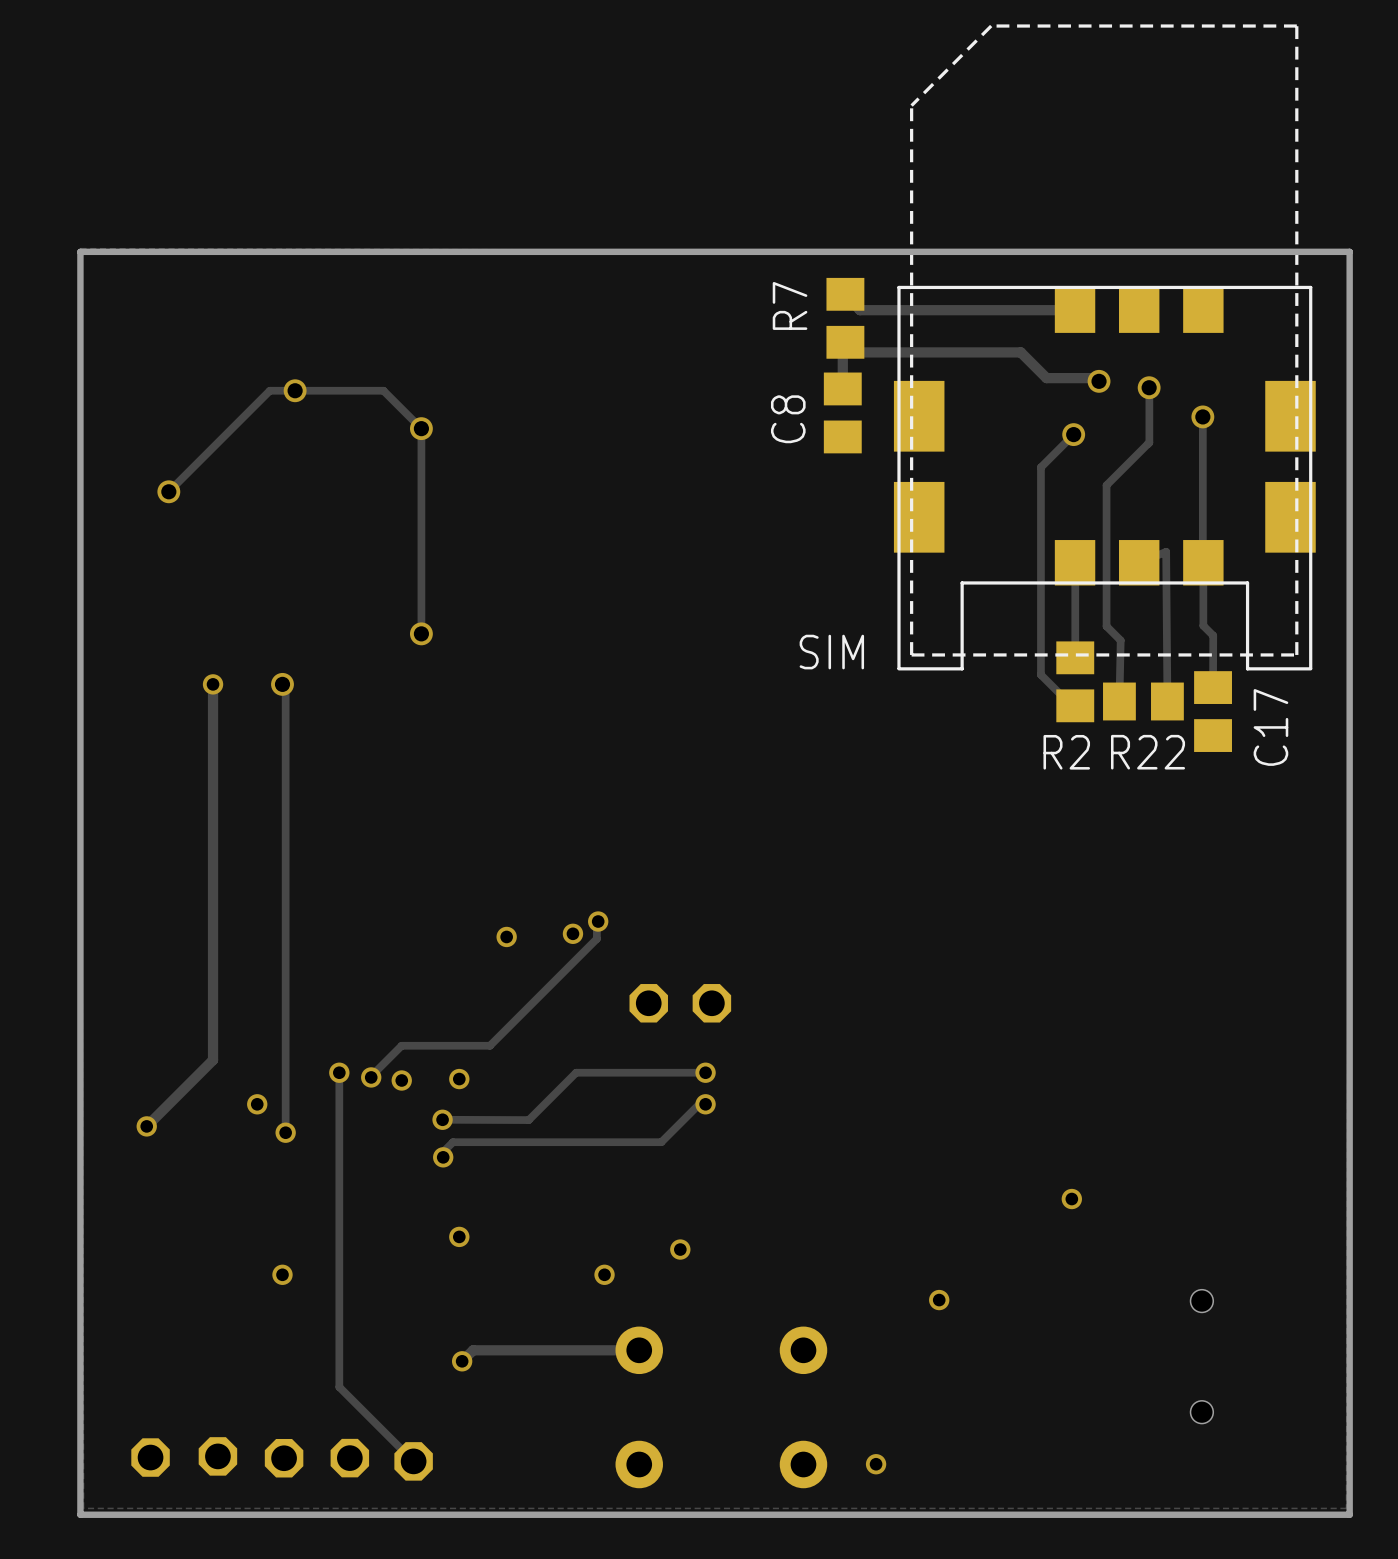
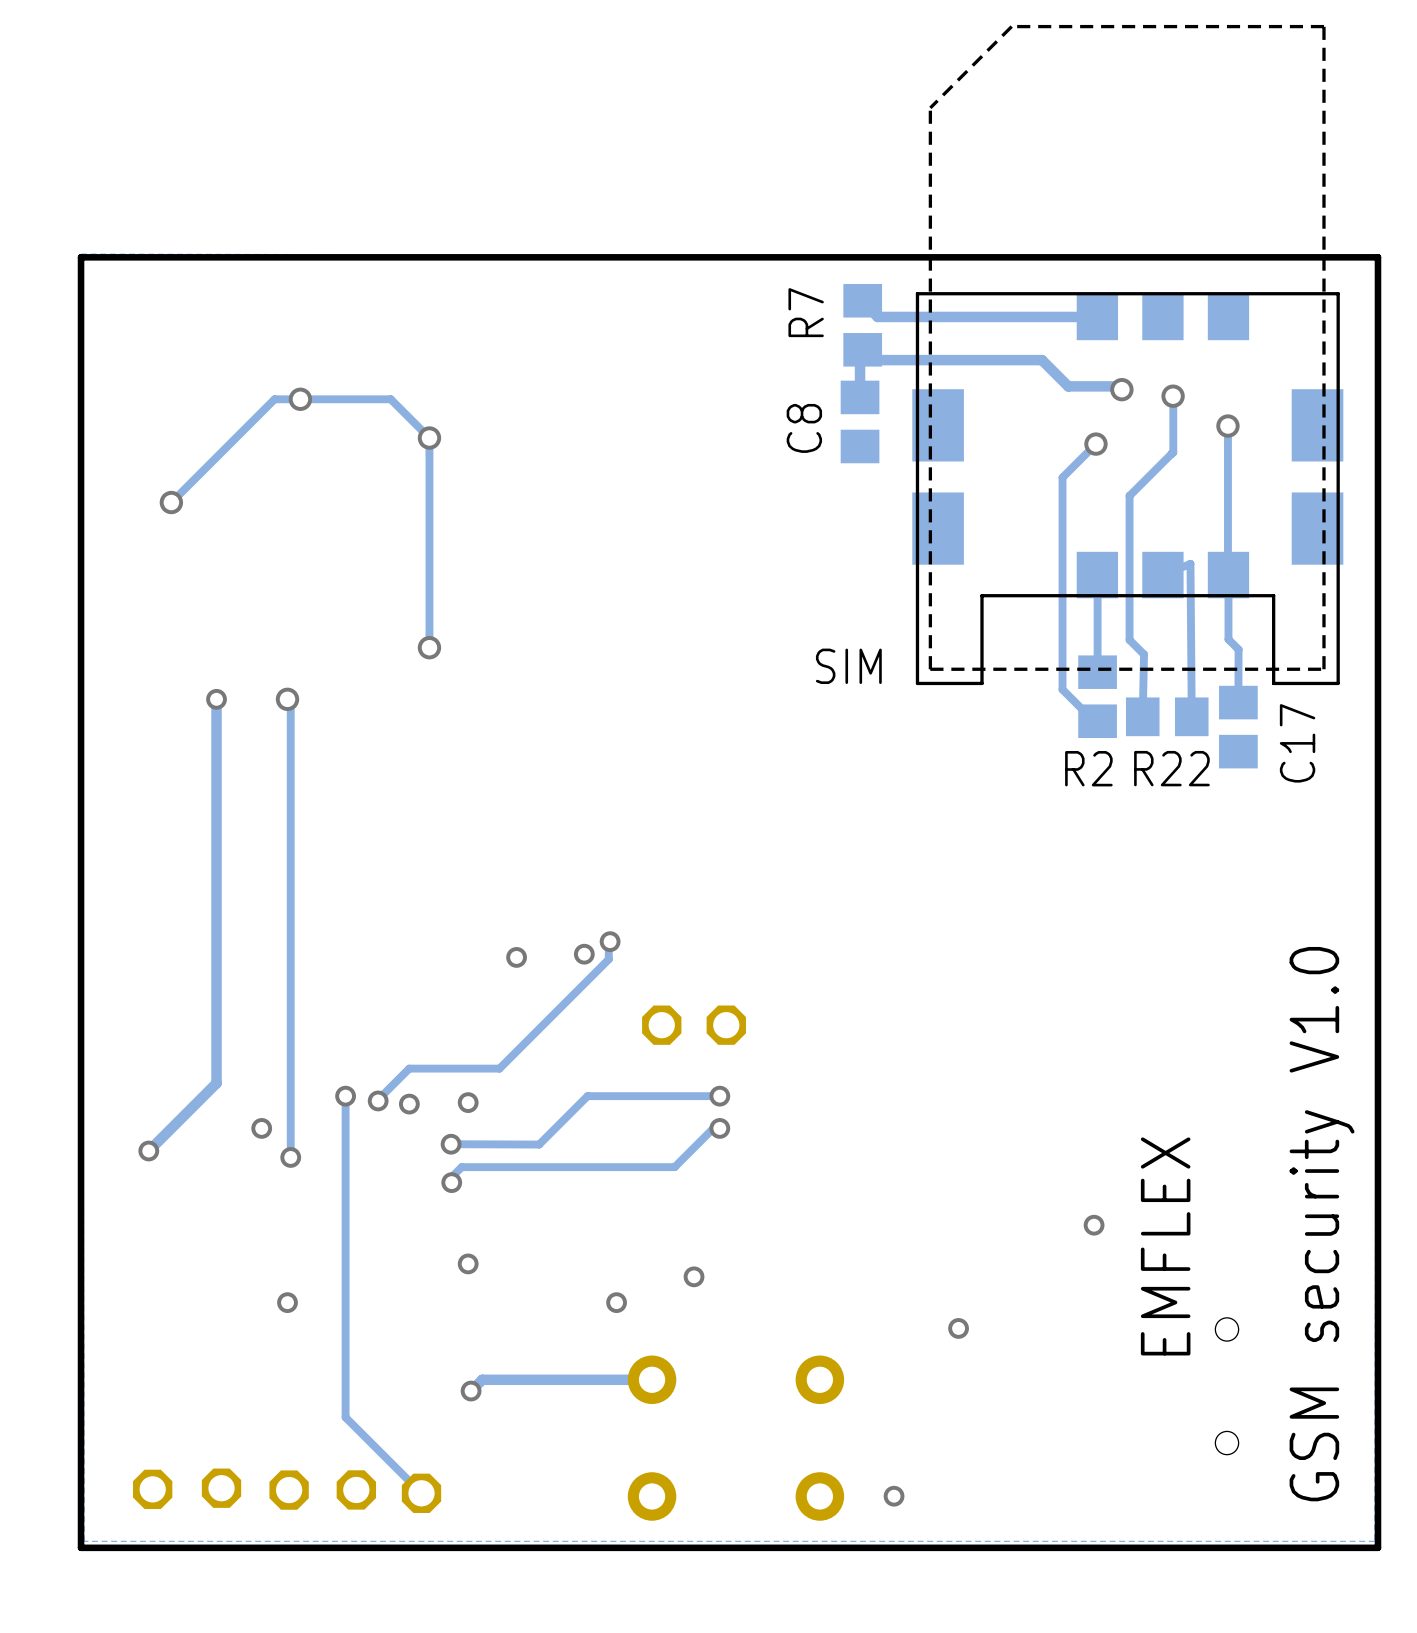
text: none -> GSM security V1.0 (1322, 1224)
text: none -> EMFLEX (1165, 1246)

